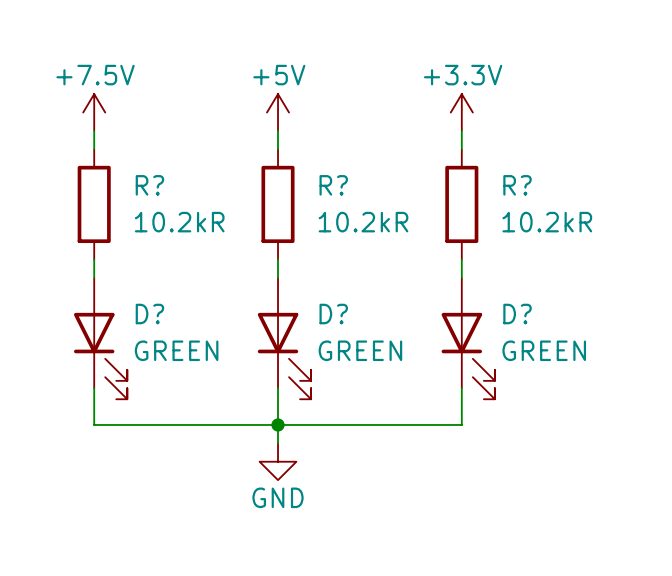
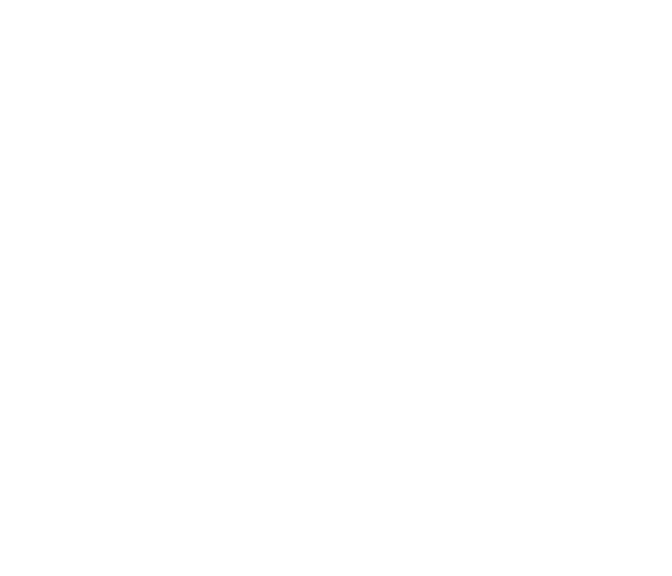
power symbol: +7.5V (94, 112) -> none
power symbol: +5V (278, 112) -> none
power symbol: +3.3V (461, 112) -> none
wire: (94, 130) (94, 149) -> none
wire: (278, 130) (278, 149) -> none
wire: (461, 130) (461, 149) -> none
R?: 10.2kR (94, 204) -> none
R?: 10.2kR (278, 204) -> none
R?: 10.2kR (461, 204) -> none
wire: (94, 259) (94, 277) -> none
wire: (278, 259) (278, 277) -> none
wire: (461, 259) (461, 277) -> none
D?: GREEN (100, 338) -> none
D?: GREEN (284, 338) -> none
D?: GREEN (468, 338) -> none
wire: (94, 388) (94, 424) (461, 424) (461, 388) -> none
wire: (278, 388) (278, 443) -> none
junction: (278, 424) -> none
power symbol: GND (278, 461) -> none

